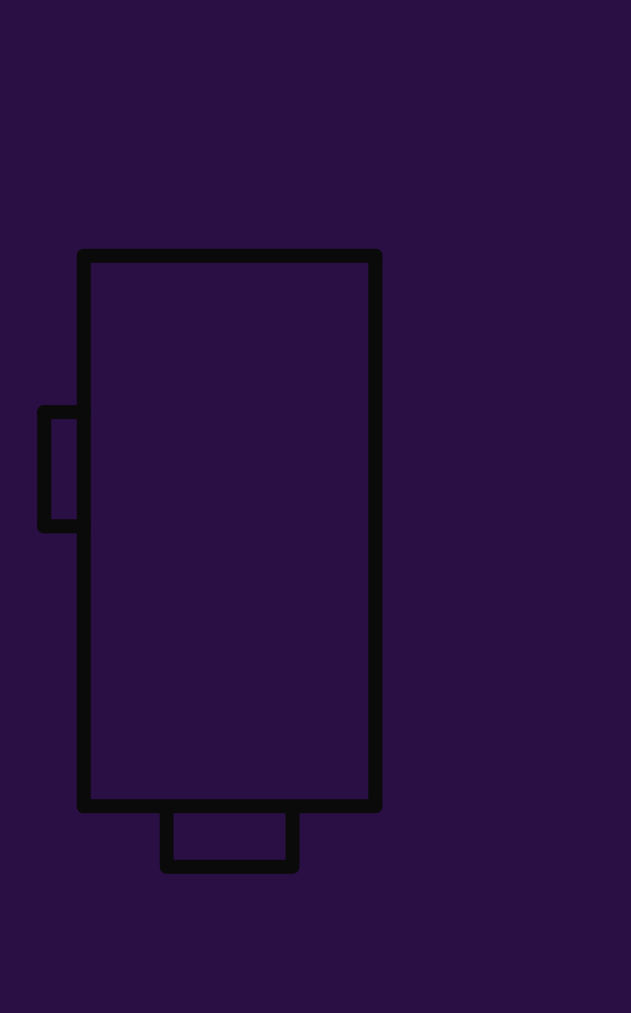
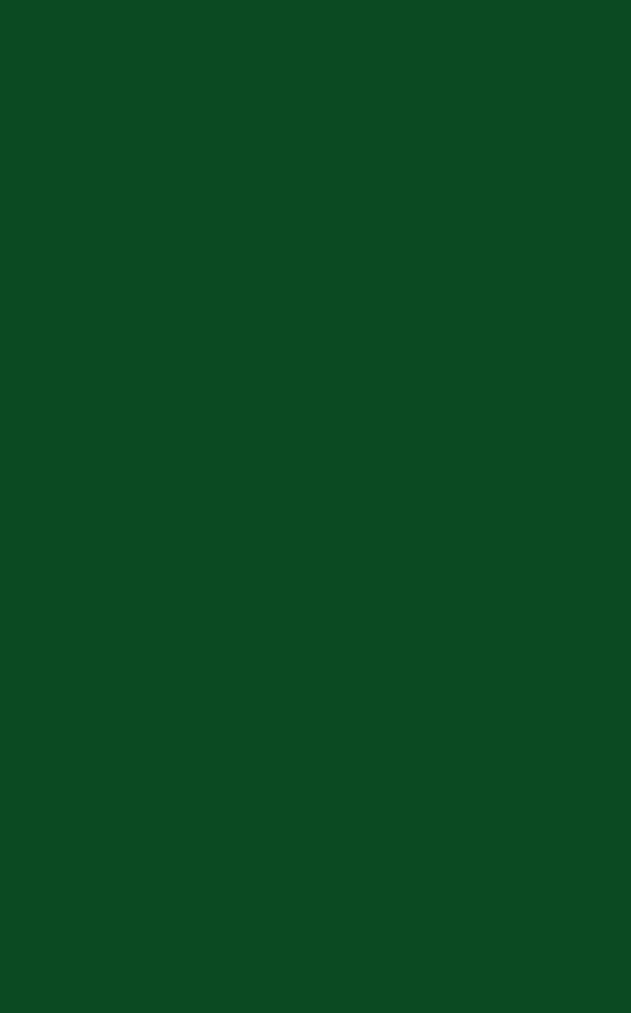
part: (209, 561) -> none

